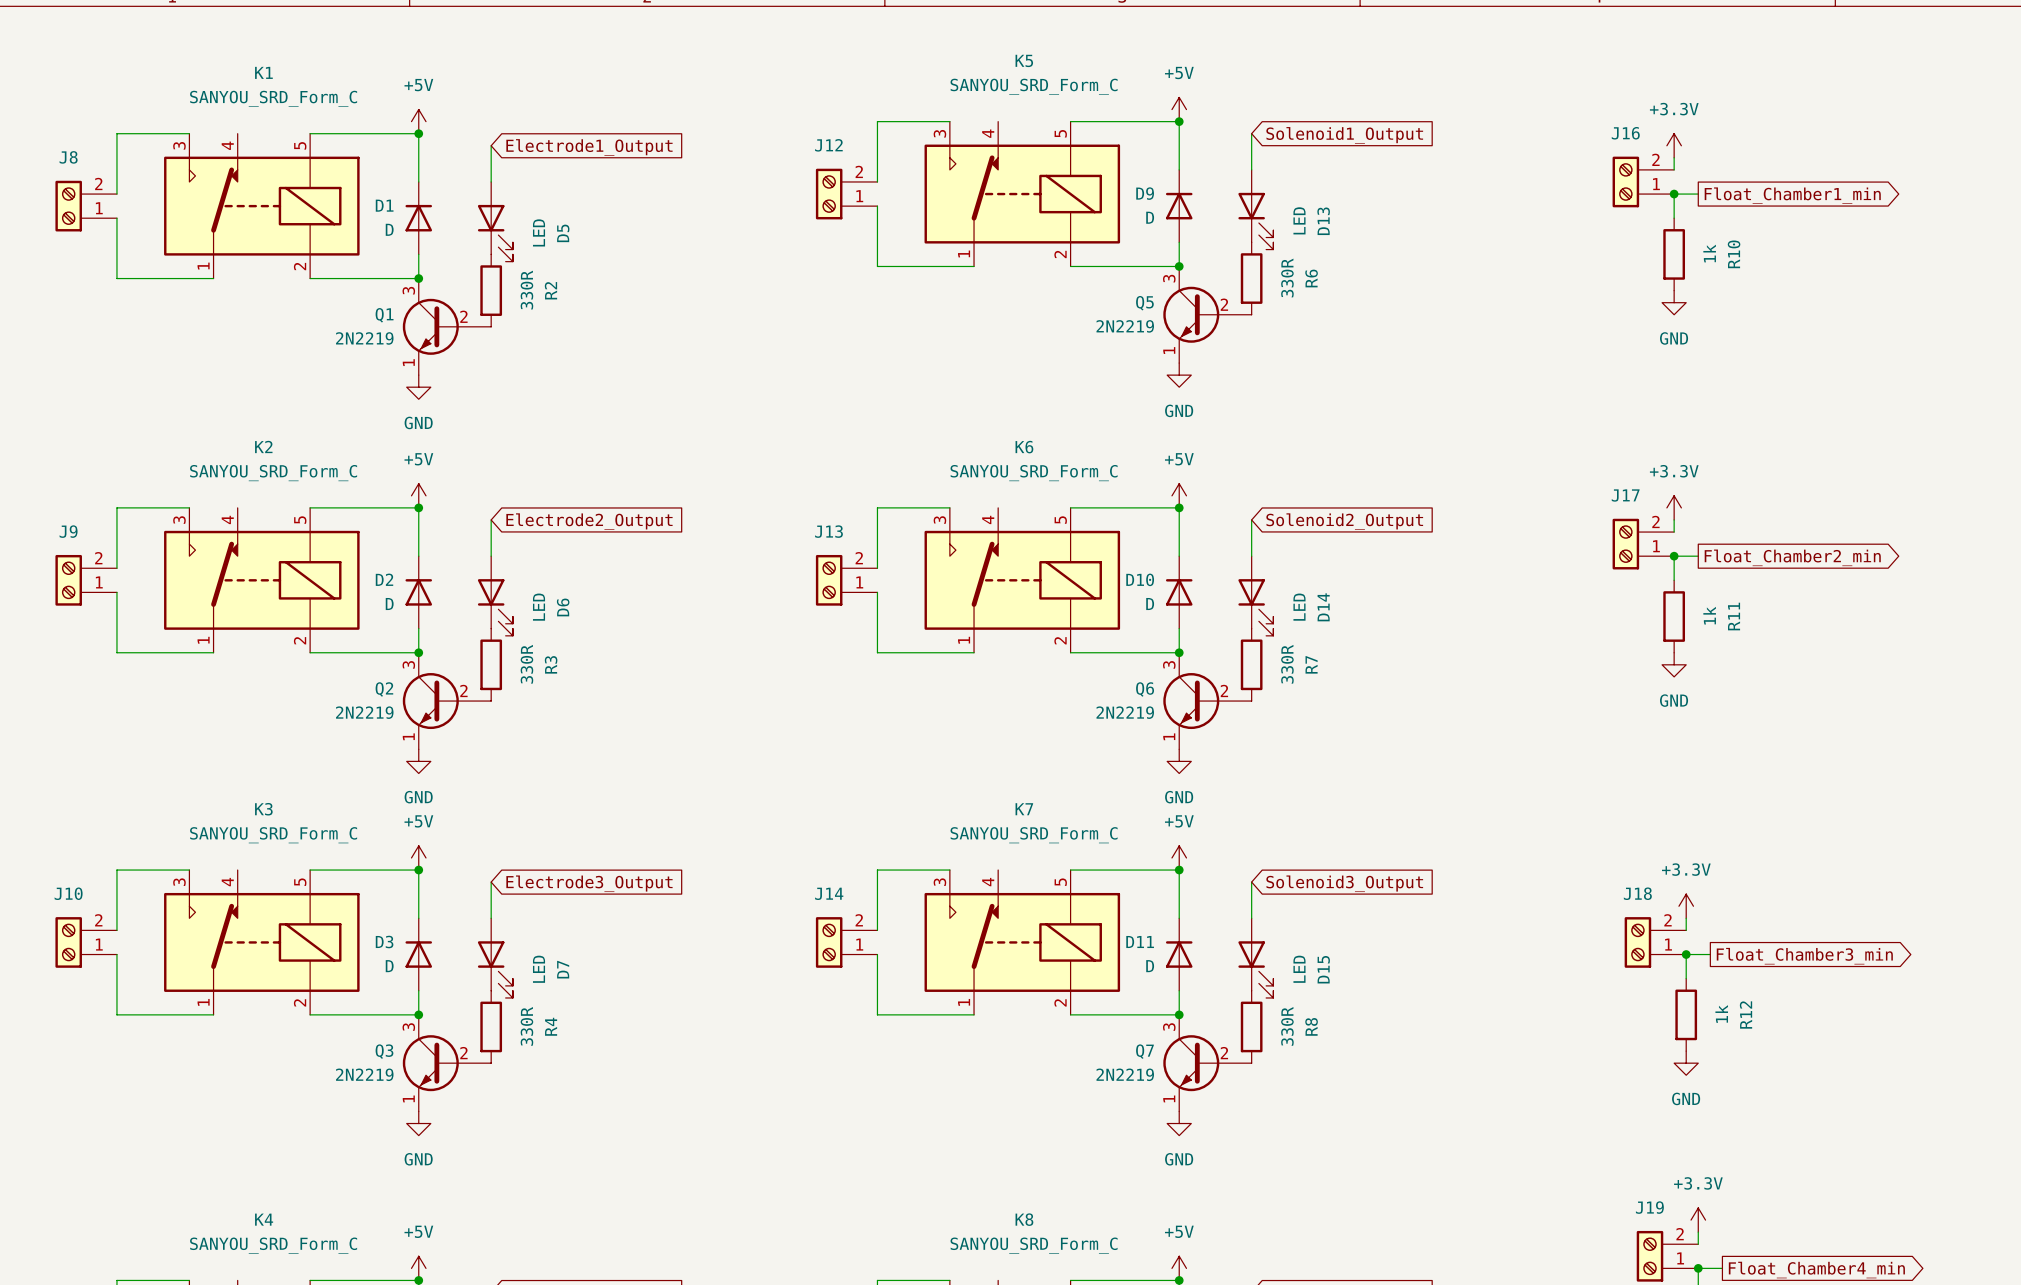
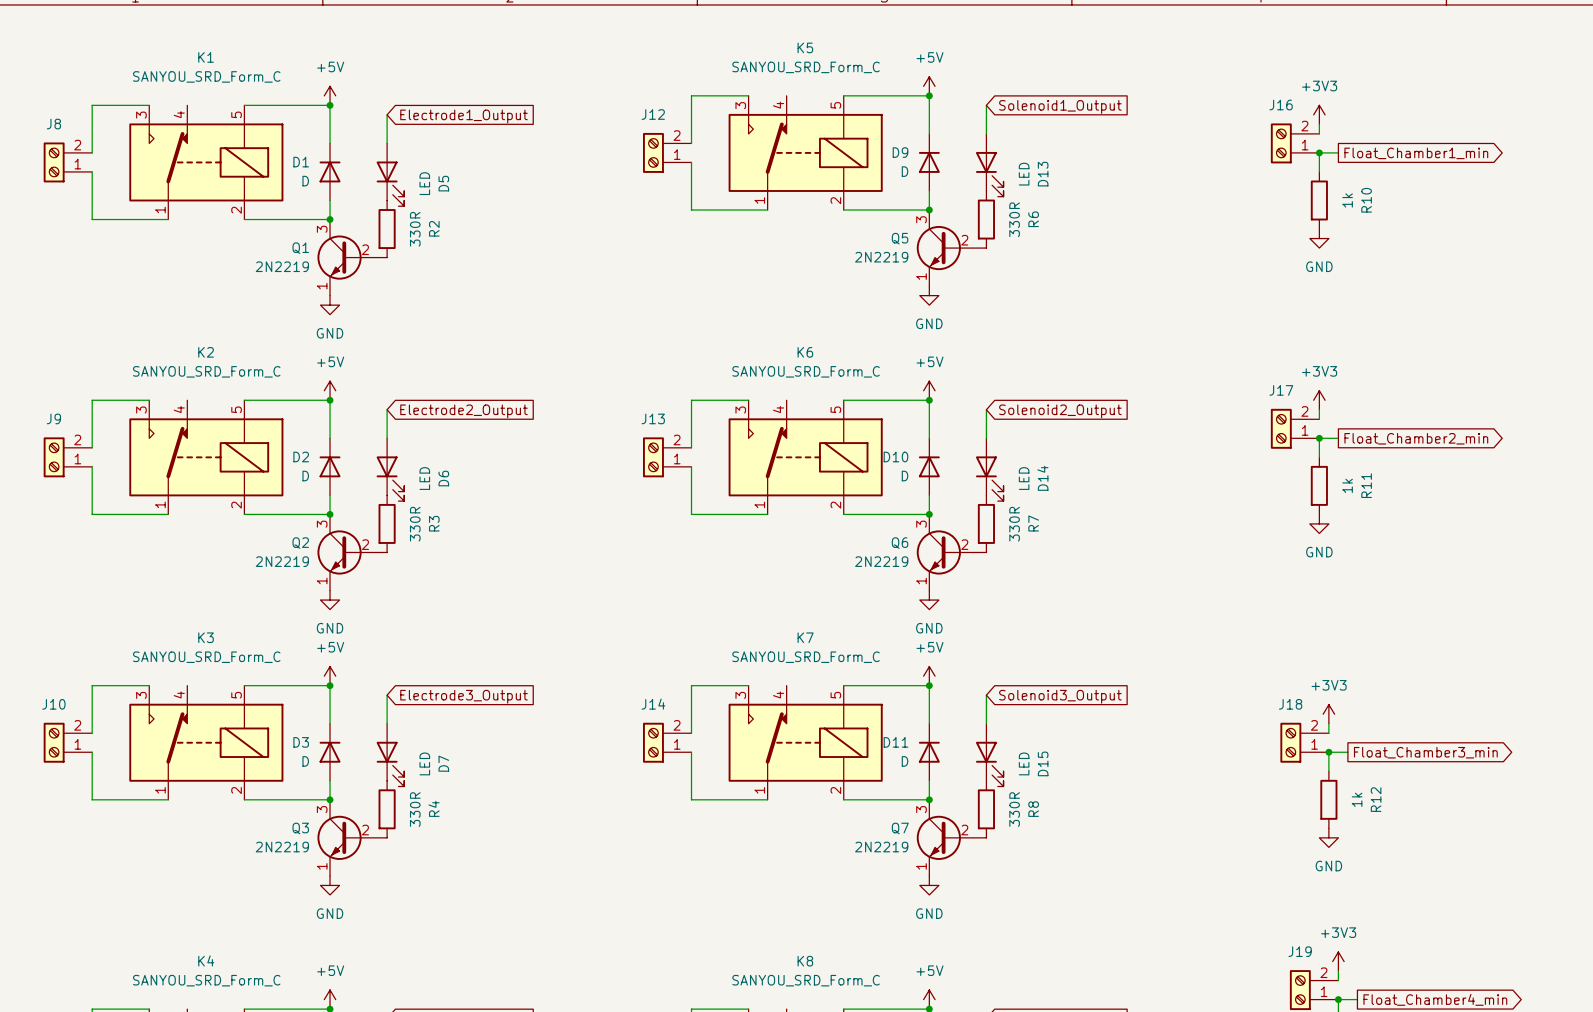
power symbol: +3.3V (1674, 145) -> +3V3 (1319, 114)
power symbol: +3.3V (1674, 507) -> +3V3 (1319, 400)
power symbol: +3.3V (1686, 906) -> +3V3 (1328, 714)
power symbol: +3.3V (1698, 1220) -> +3V3 (1338, 961)

